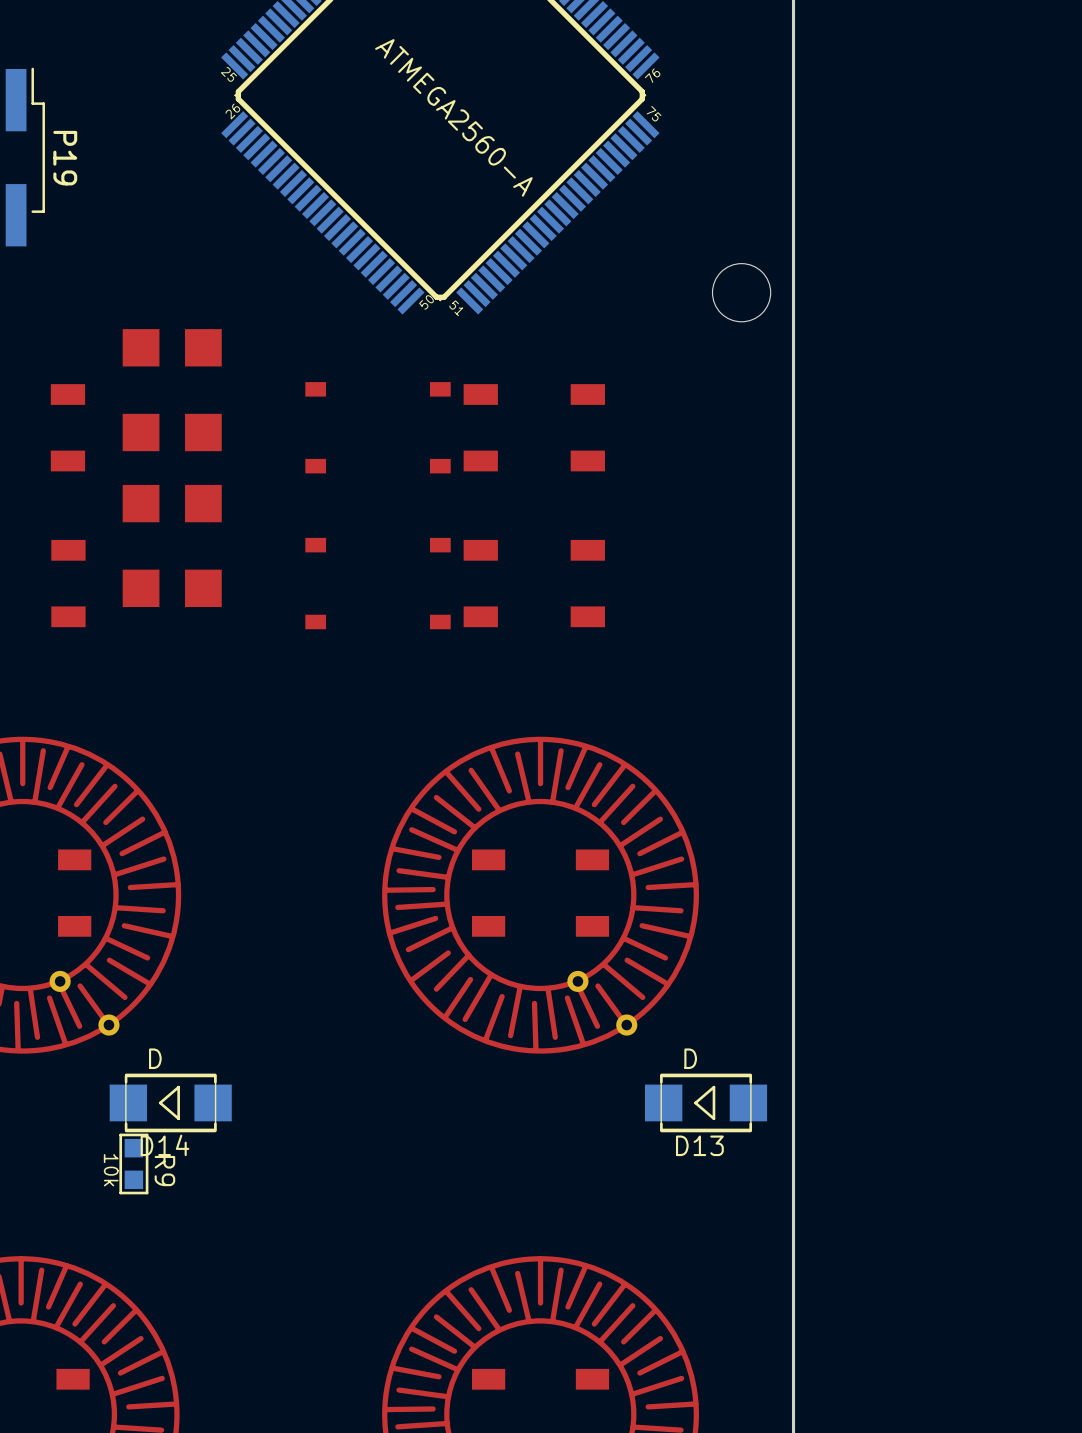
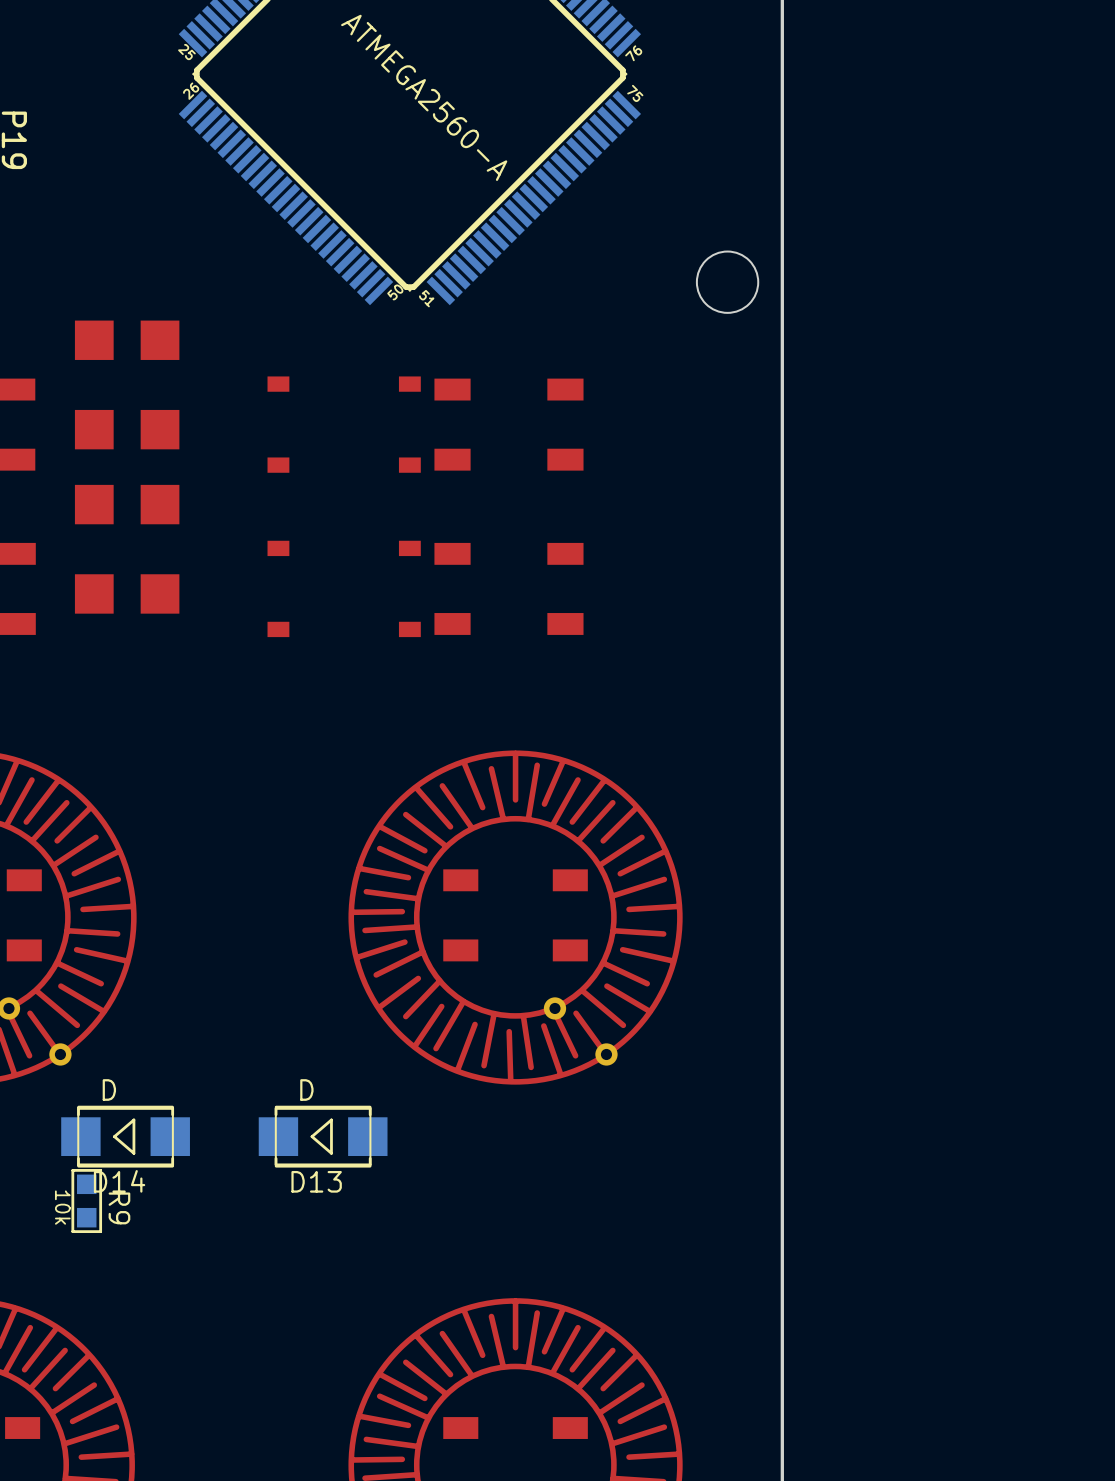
D13 position: (706, 1102) -> (323, 1136)

